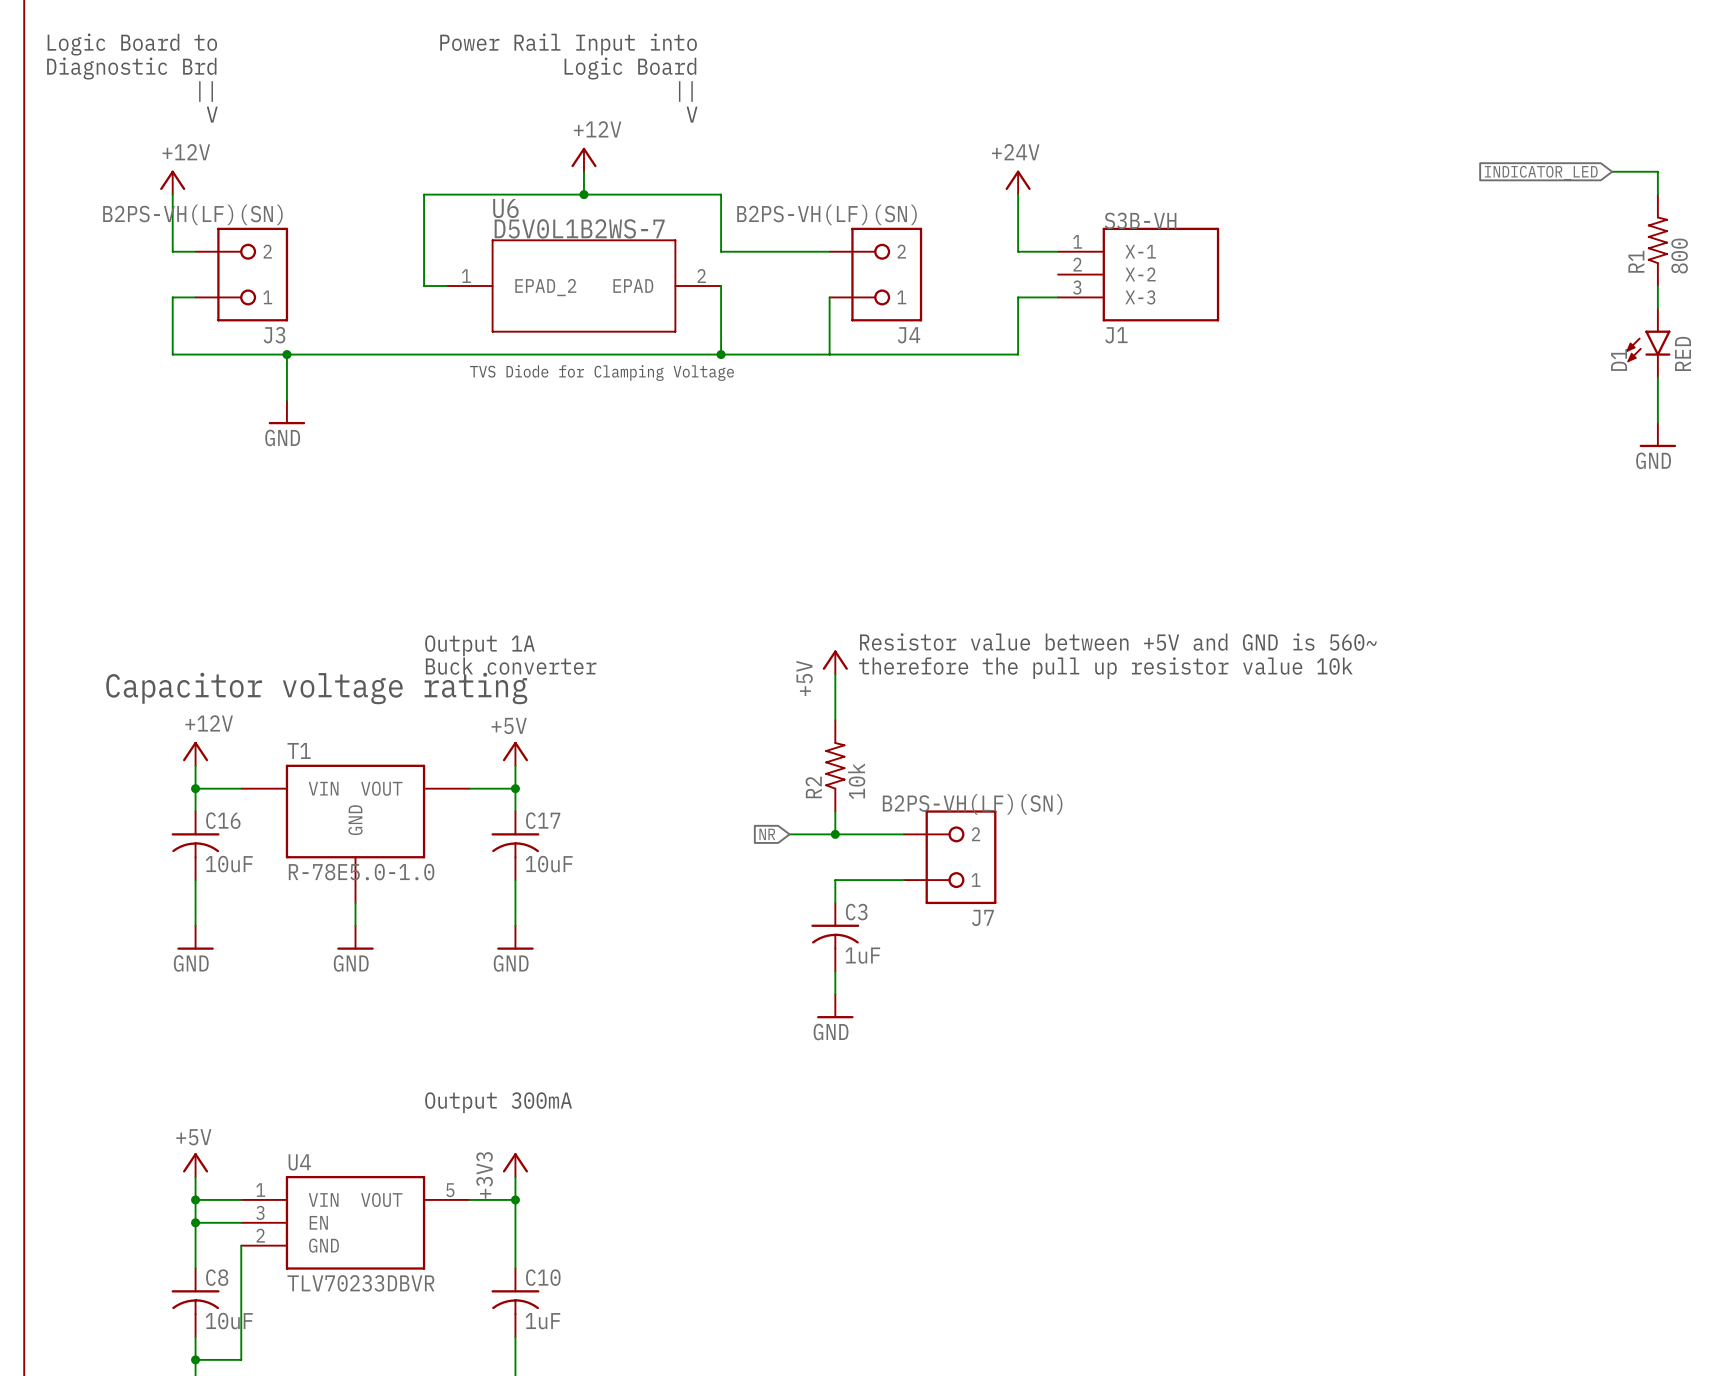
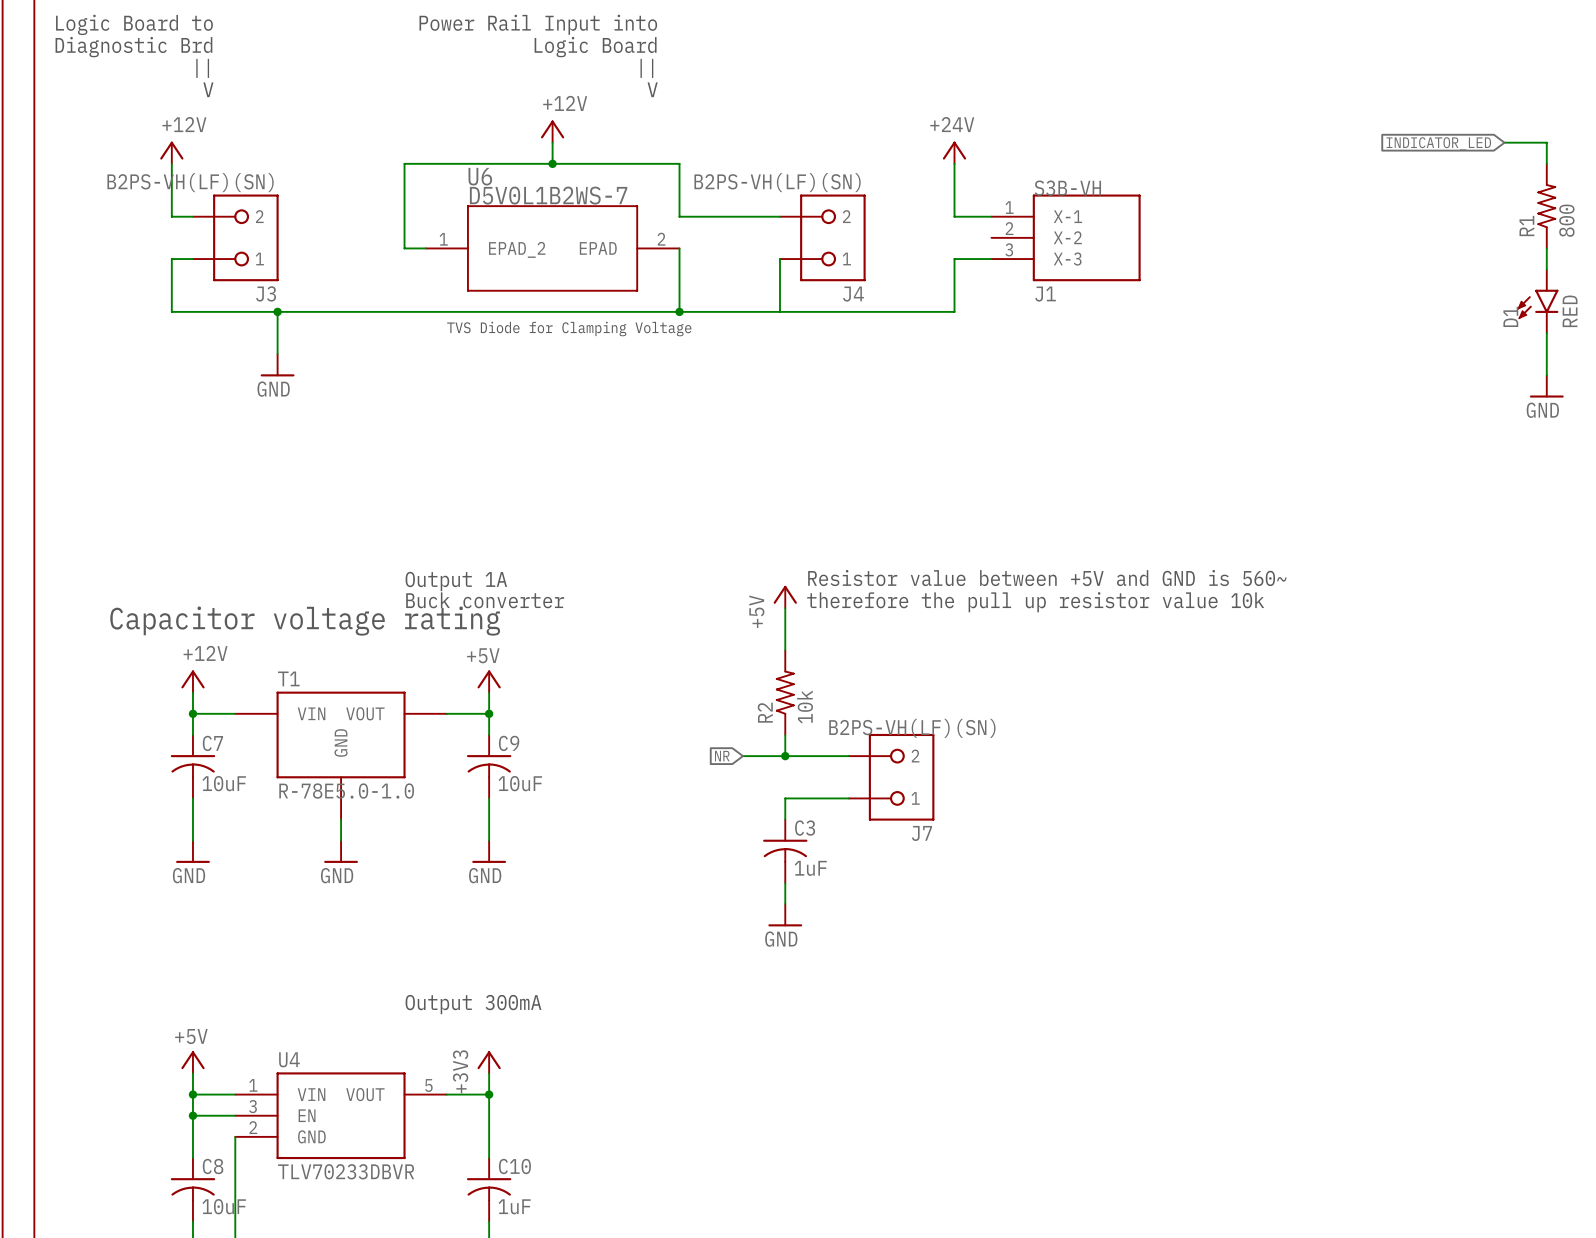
C16 name: C16 (223, 820) -> C7 (212, 743)
C17 name: C17 (543, 820) -> C9 (509, 743)

